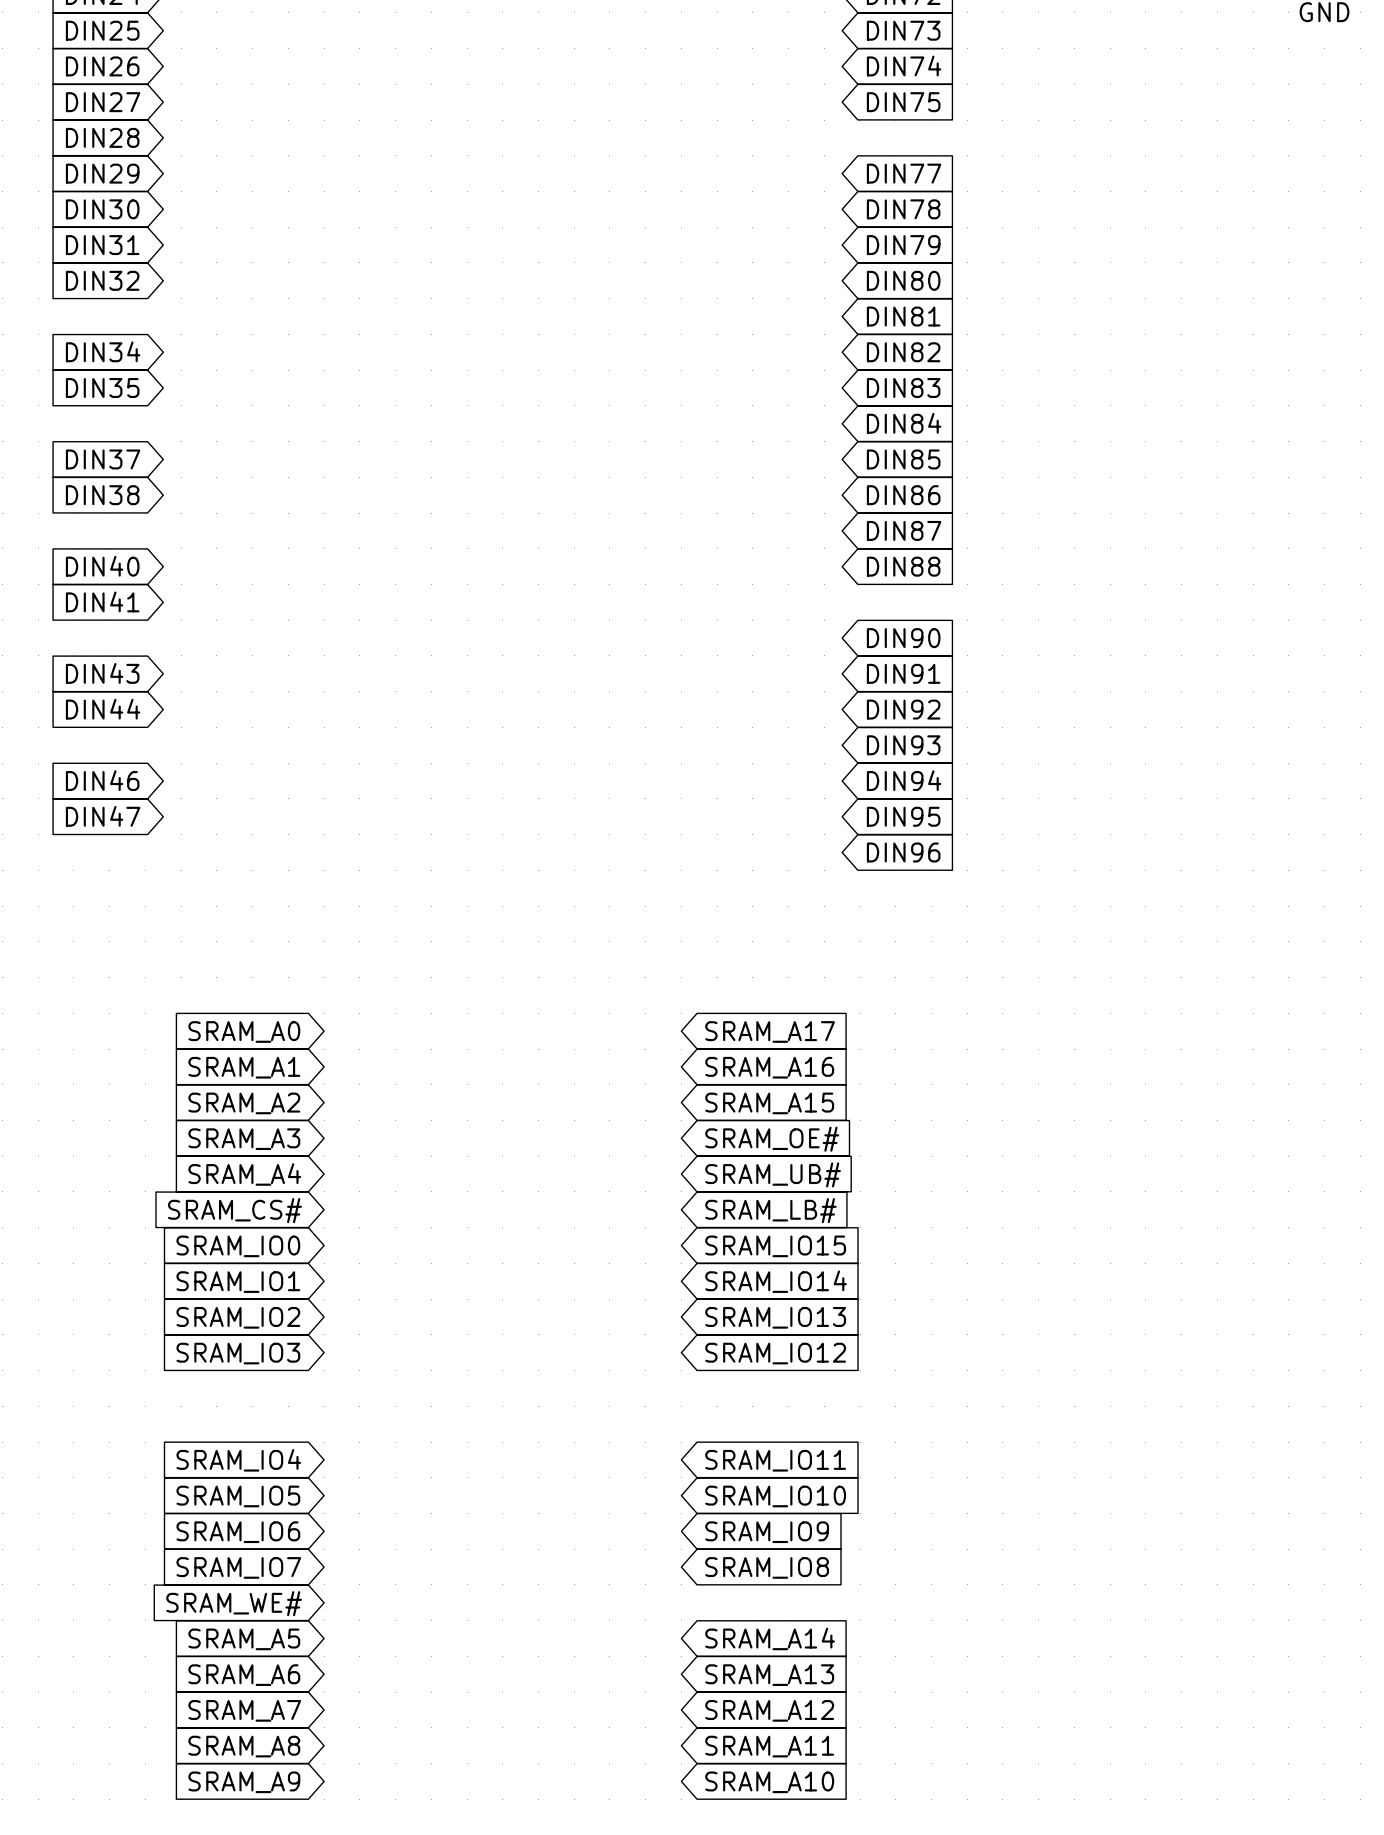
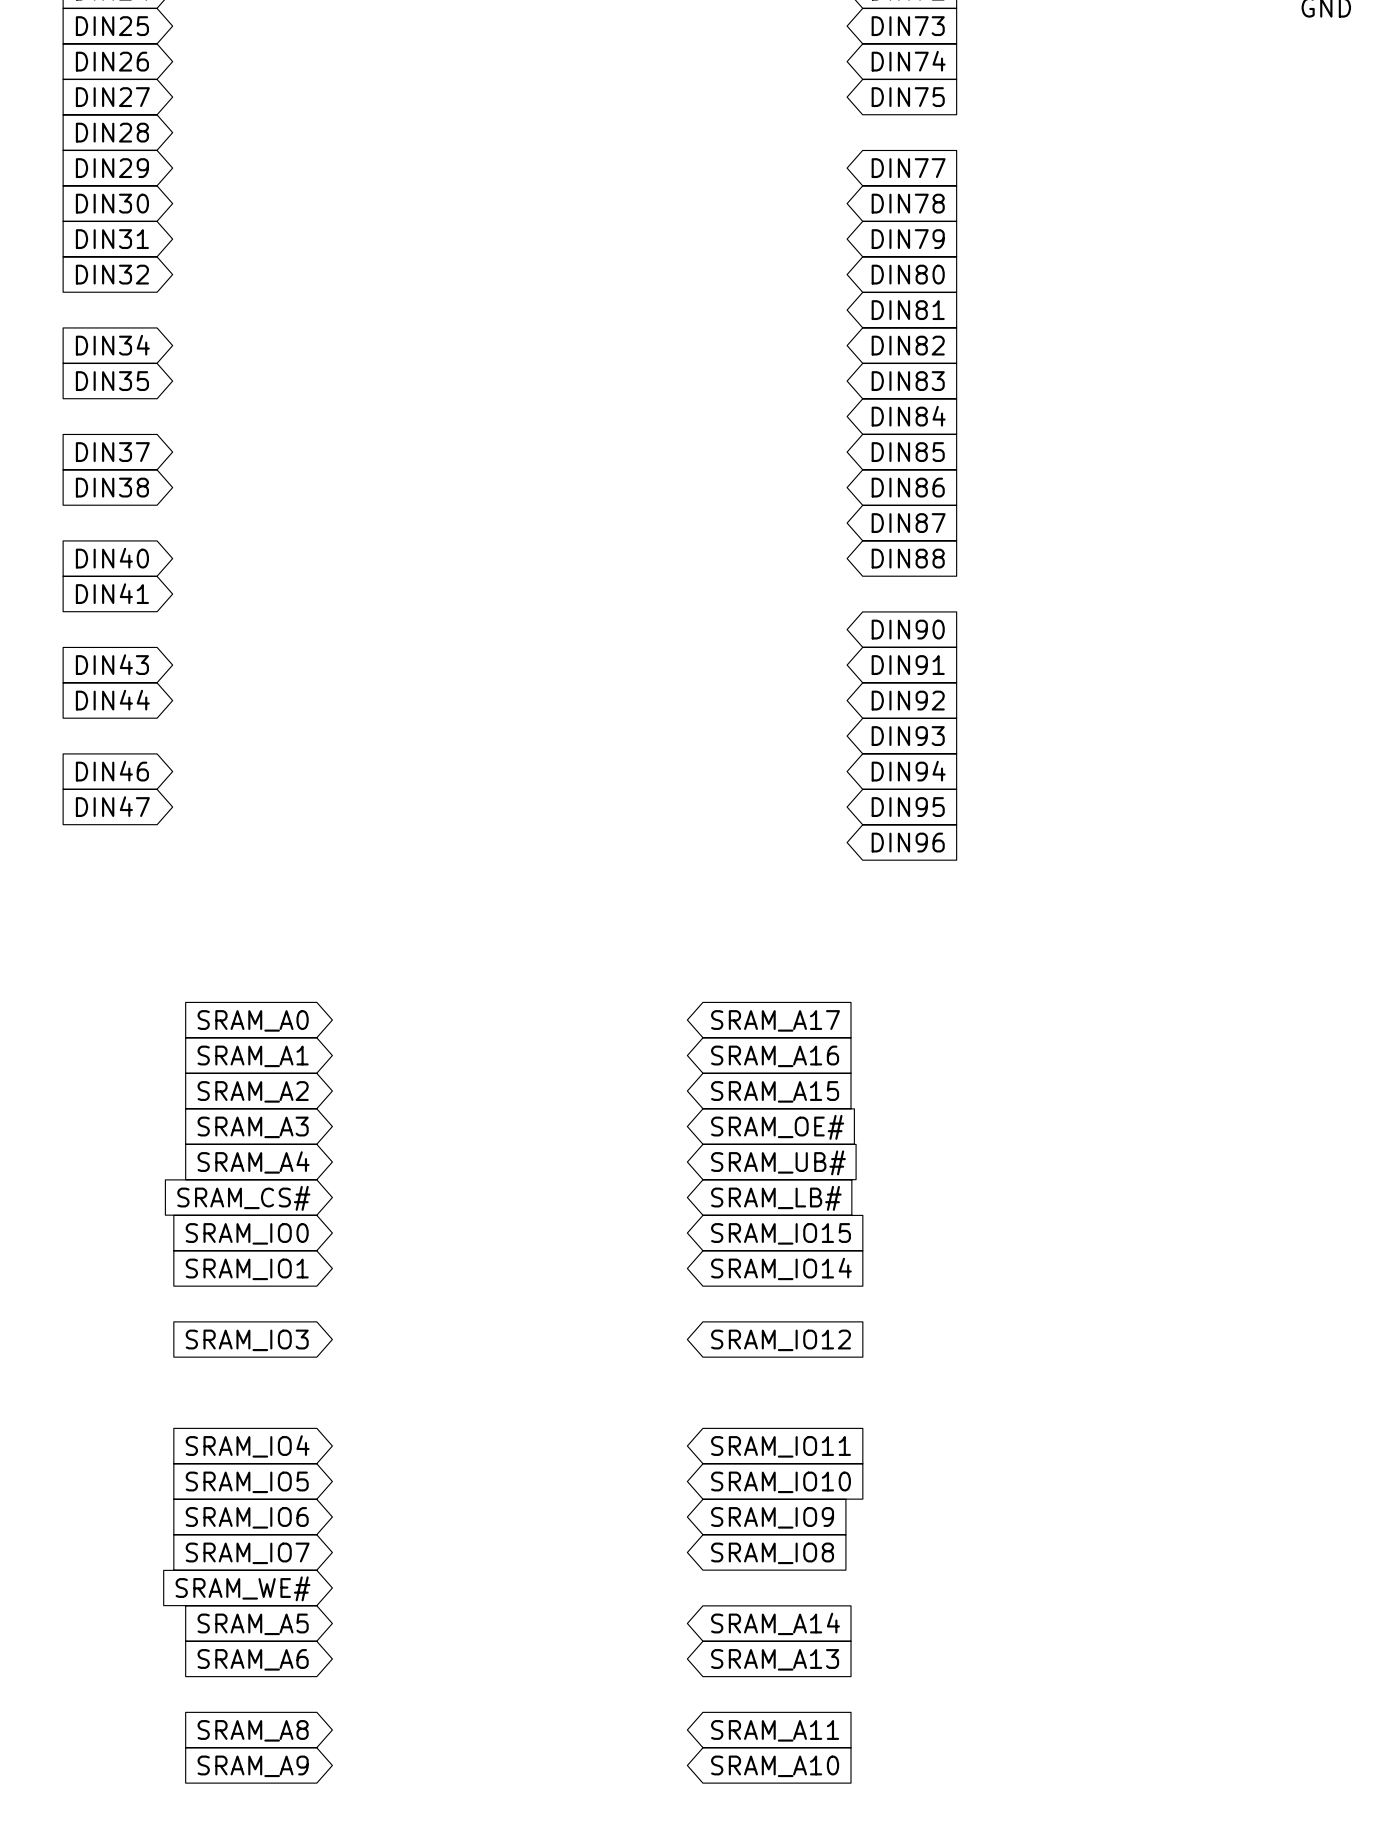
global label: SRAM_IO2 (238, 1317) -> none
global label: SRAM_IO13 (775, 1317) -> none
global label: SRAM_A7 (244, 1710) -> none
global label: SRAM_A12 (769, 1710) -> none

